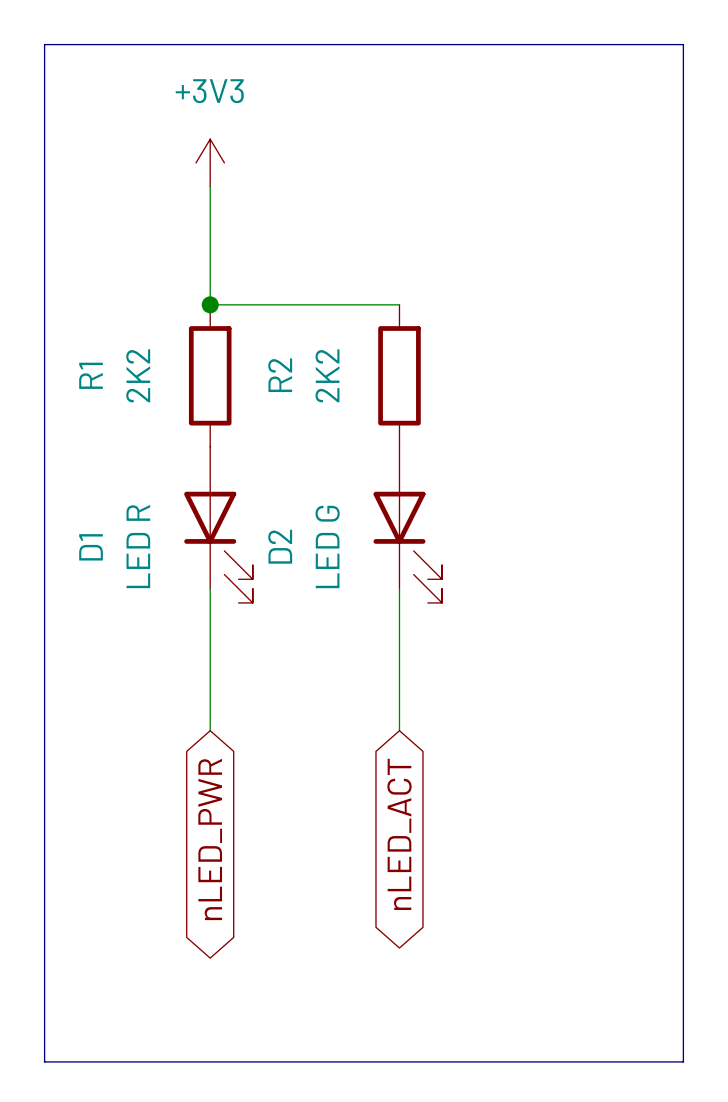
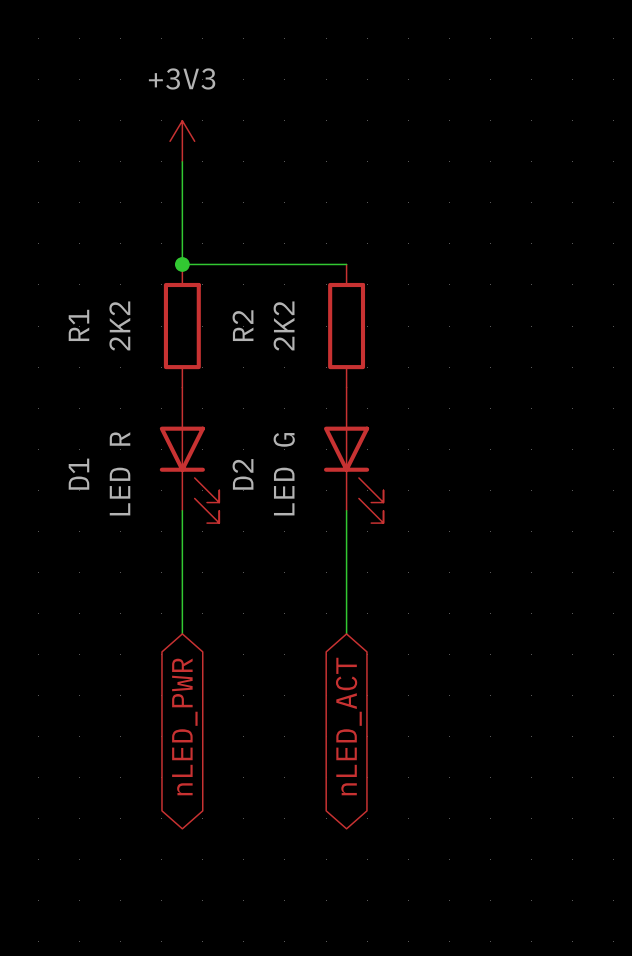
line: (44, 44) (44, 1061) (683, 1061) (683, 44) (44, 44) -> none

